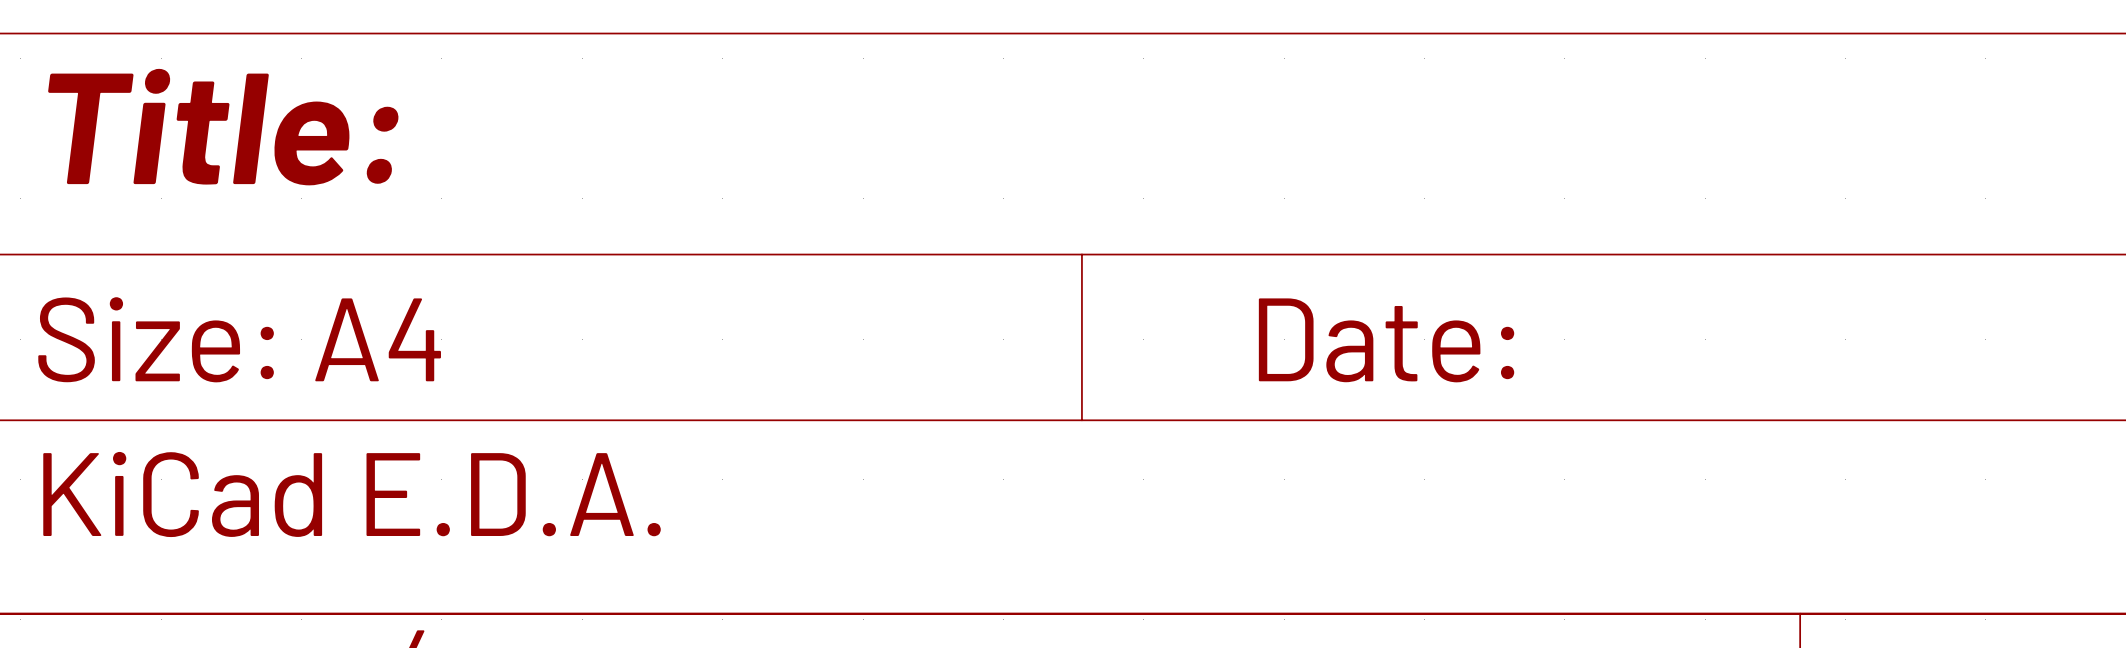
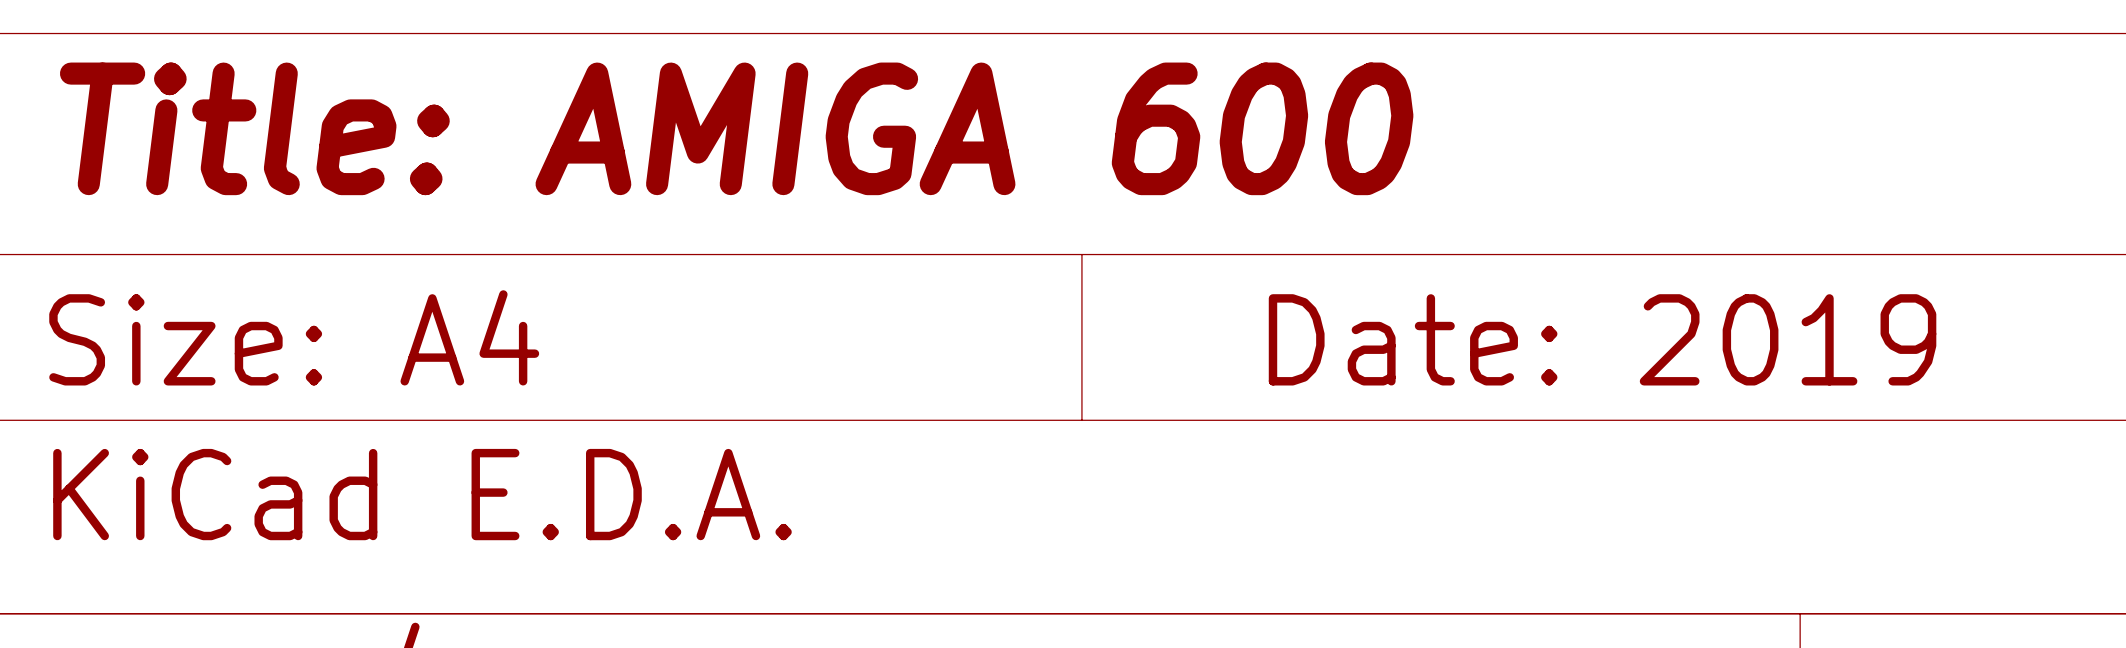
title block: Title: (223, 127) -> Title: AMIGA 600 (736, 128)
title block: Date: (1386, 340) -> Date: 2019 (1602, 339)

